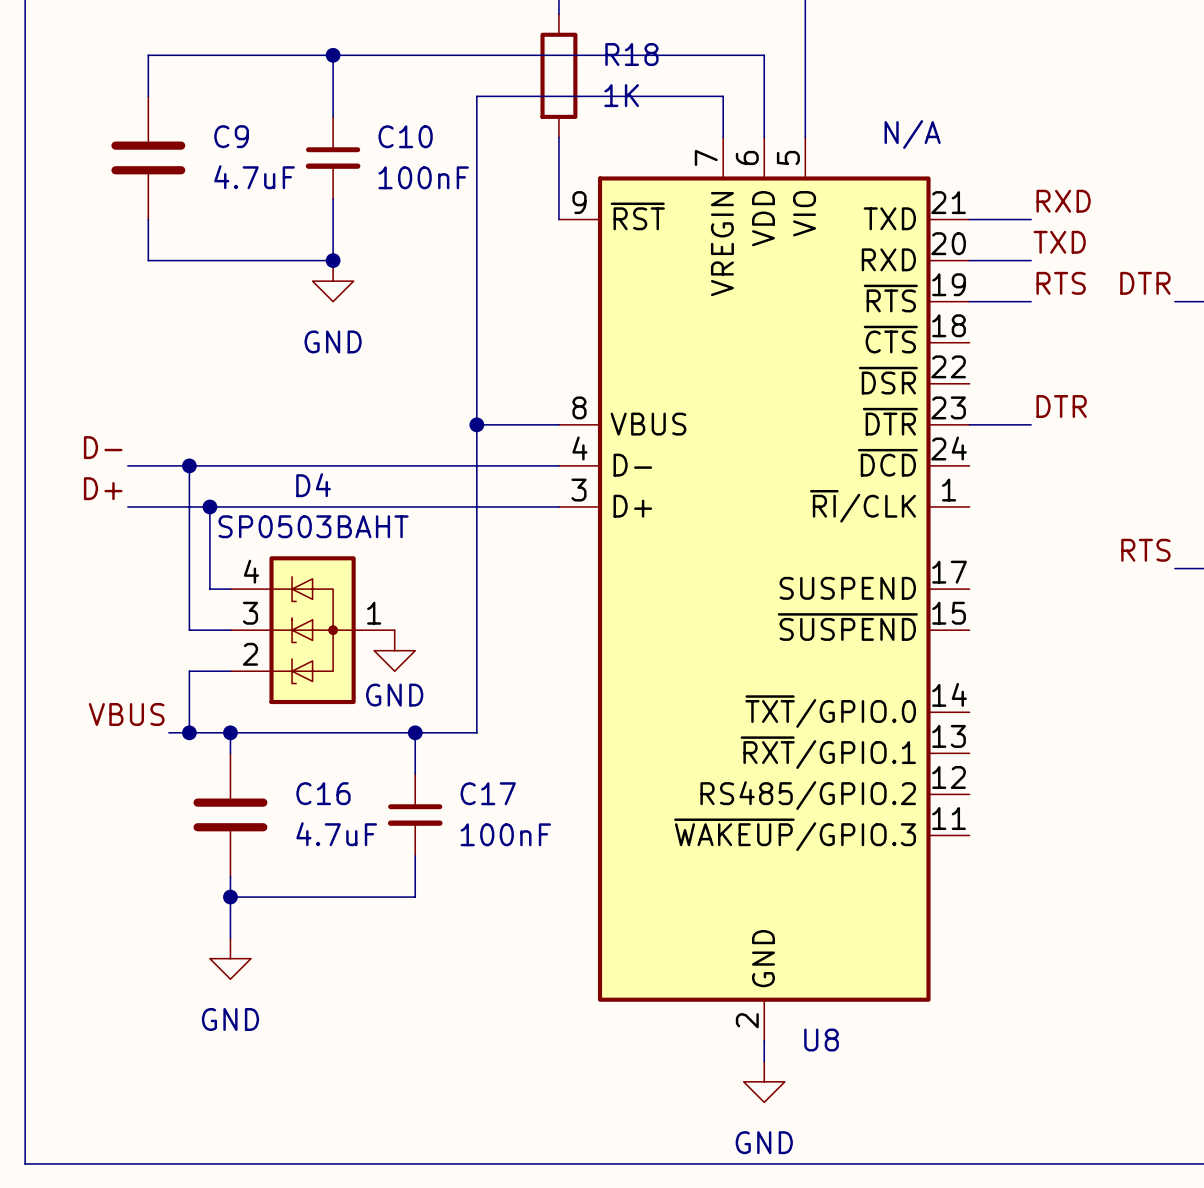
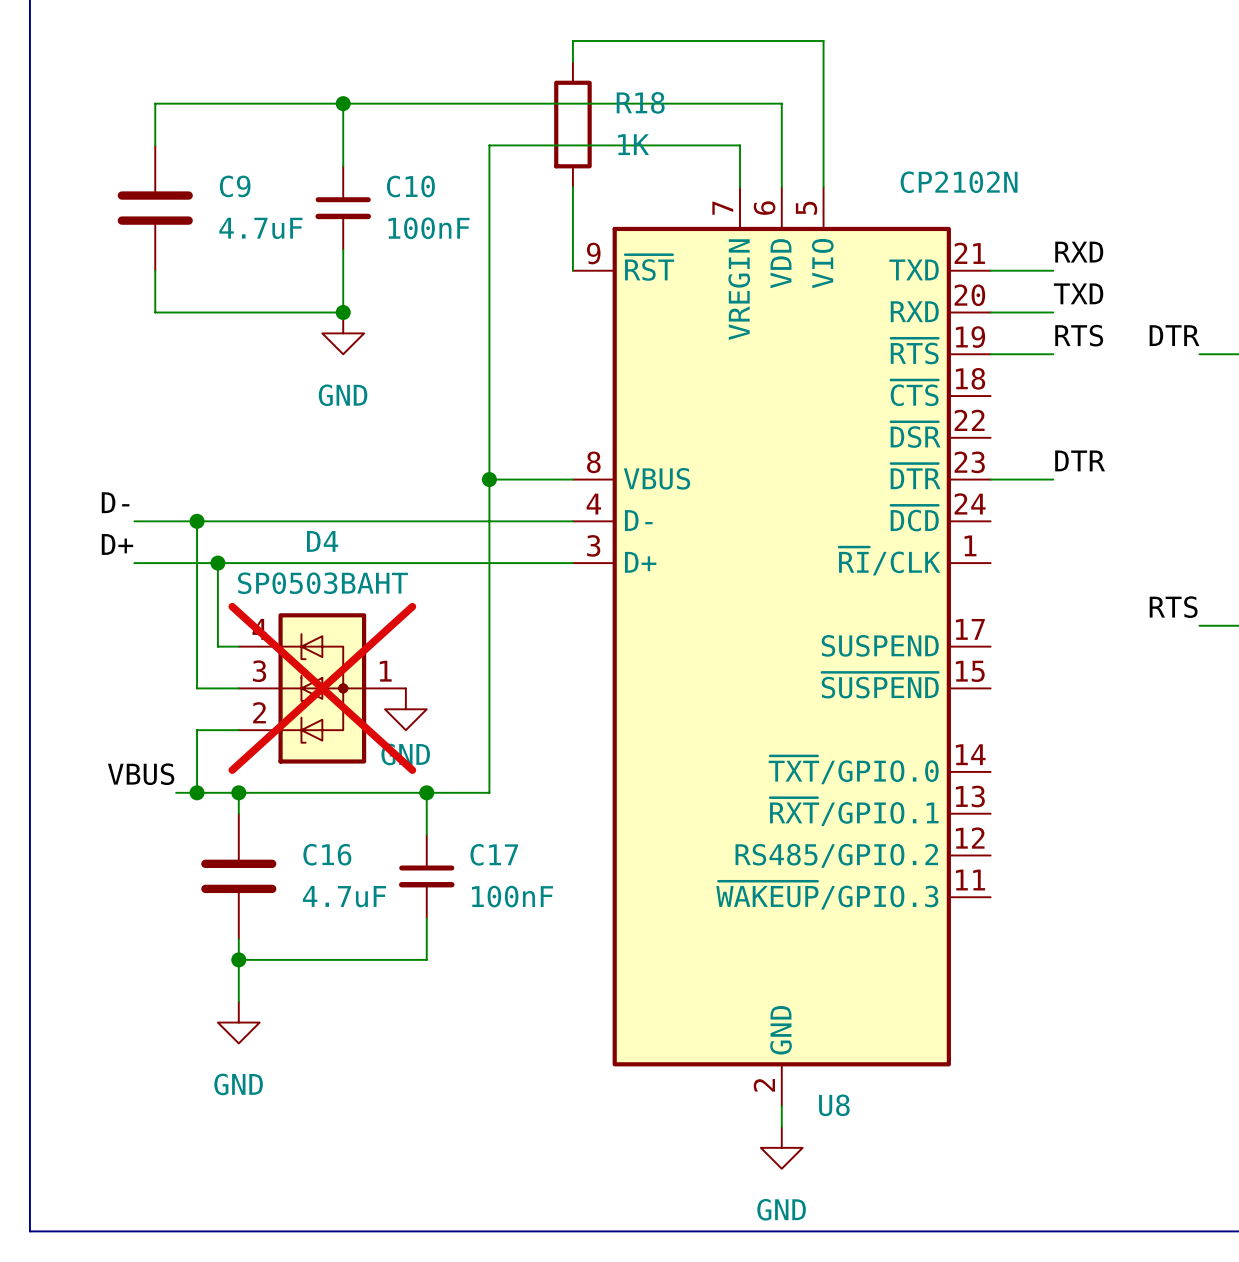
U8 value: N/A (912, 134) -> CP2102N (959, 182)
D4 do-not-place cross: none -> (322, 688)

